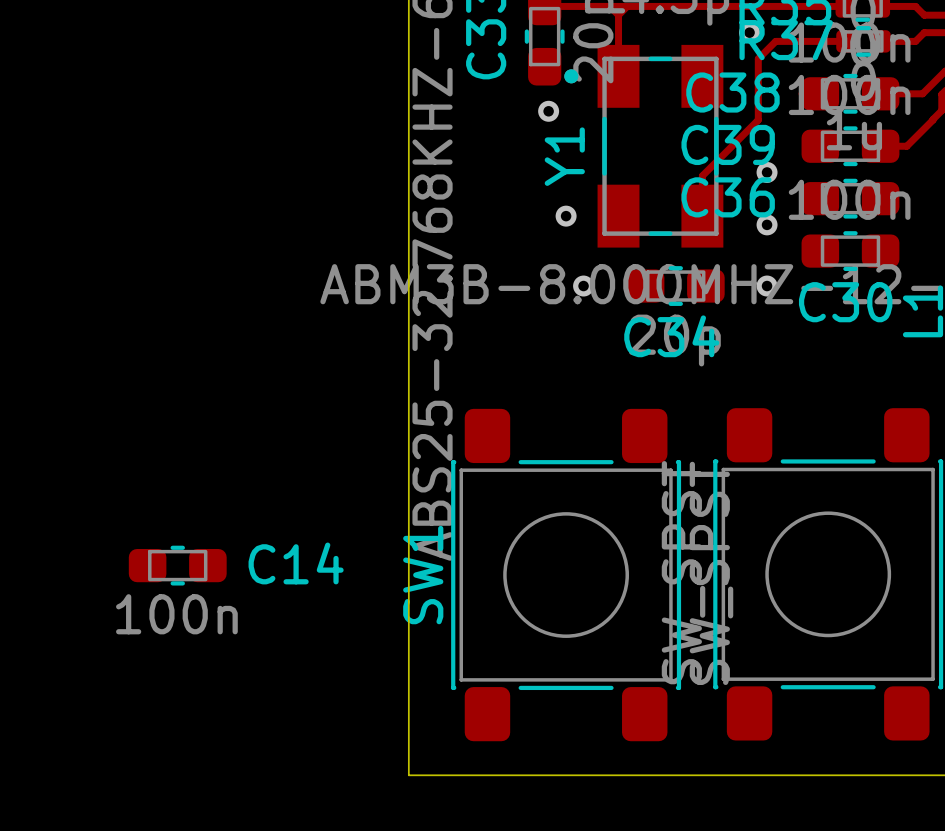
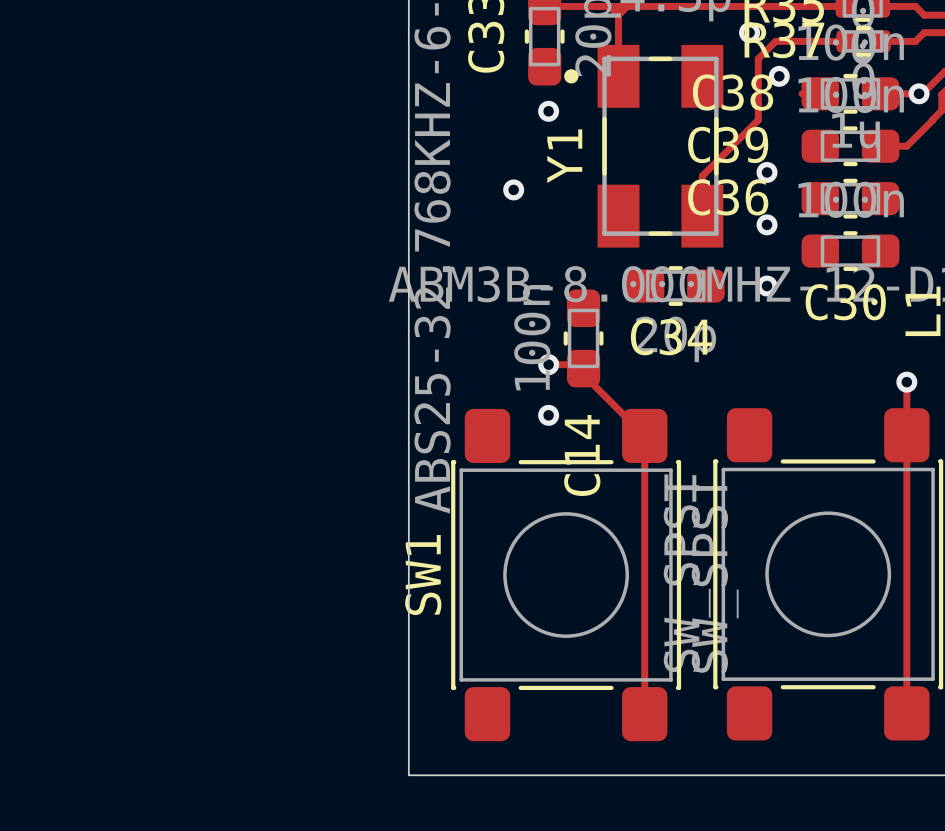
via: none -> (779, 76)
via: none -> (919, 93)
via position: (566, 216) -> (513, 189)
via: (583, 286) -> none
track: none -> (548, 364) (579, 364) (583, 368) (583, 374) (644, 435) (644, 714)
via: none -> (548, 364)
track: none -> (906, 382) (906, 713)
via: none -> (906, 382)
via: none -> (548, 415)
C14 rotation: 0° (177, 565) -> 90° clockwise (583, 338)
C14 position: (177, 565) -> (583, 338)

